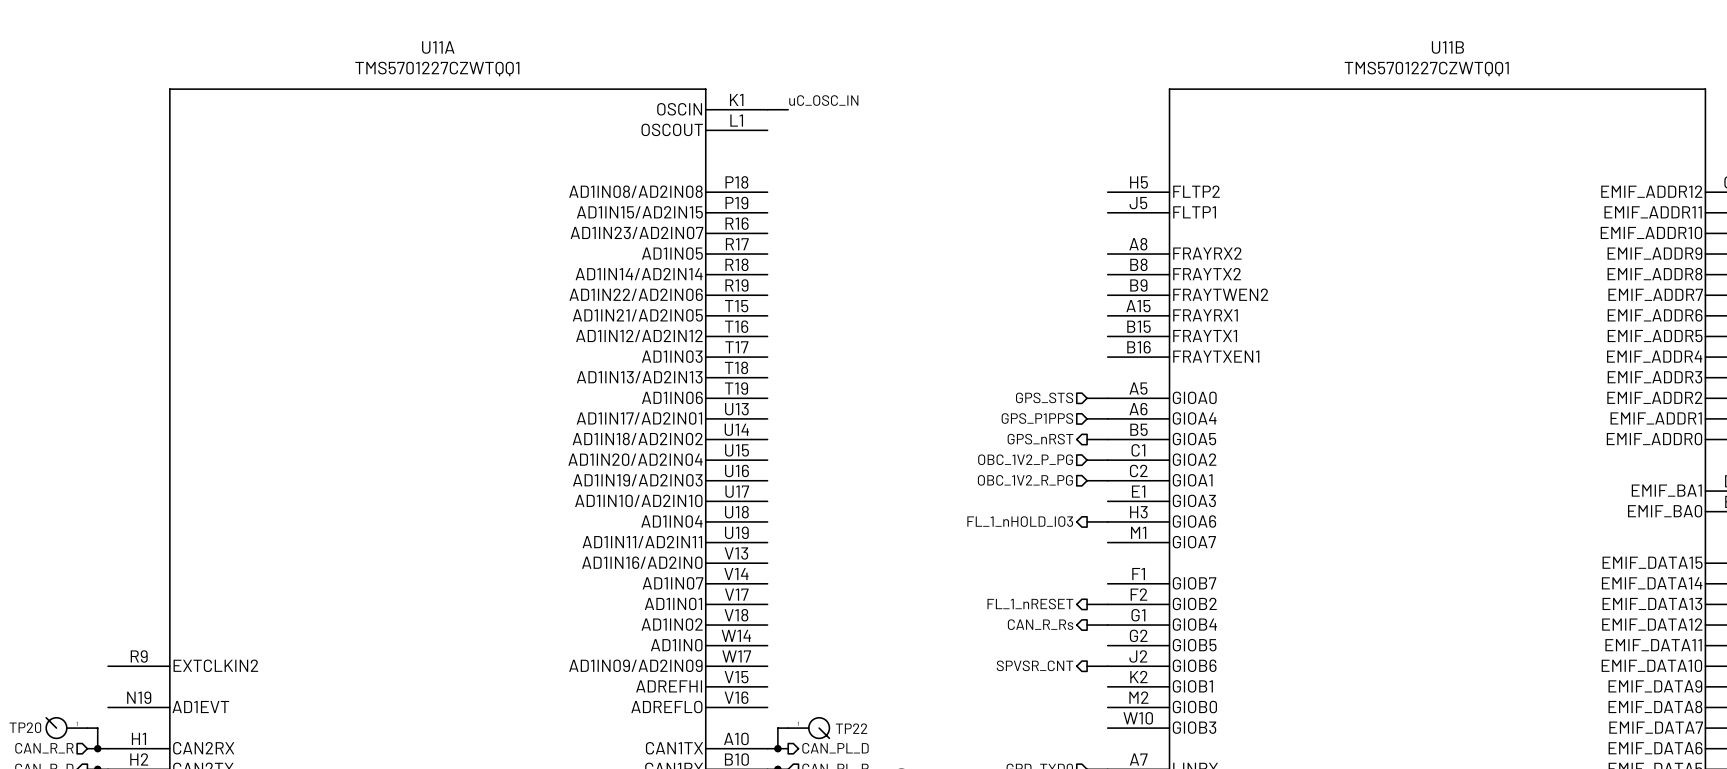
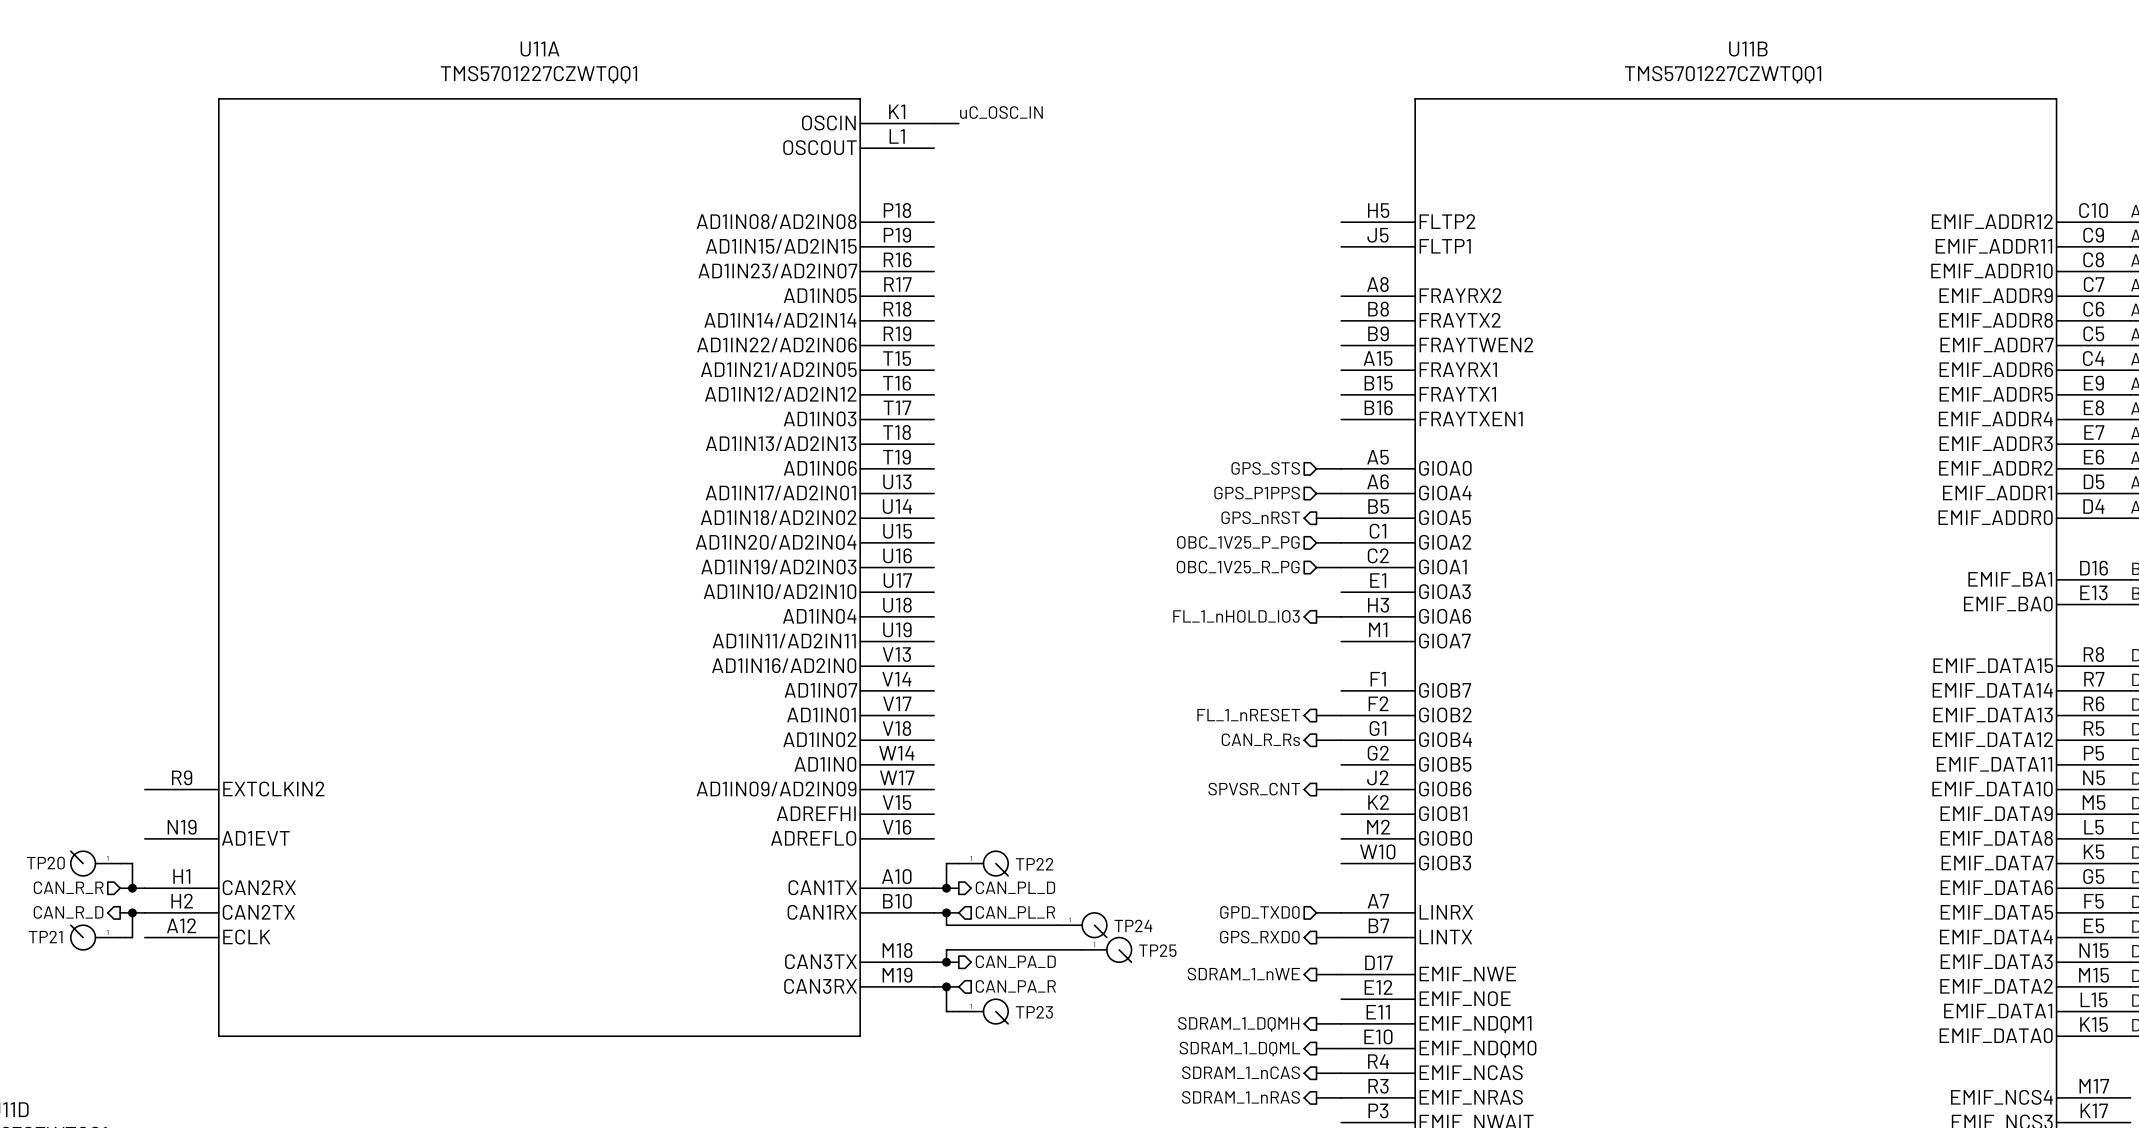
hierarchical label: OBC_1V2_P_PG (1025, 459) -> OBC_1V25_P_PG (1238, 542)
hierarchical label: OBC_1V2_R_PG (1025, 480) -> OBC_1V25_R_PG (1238, 567)

